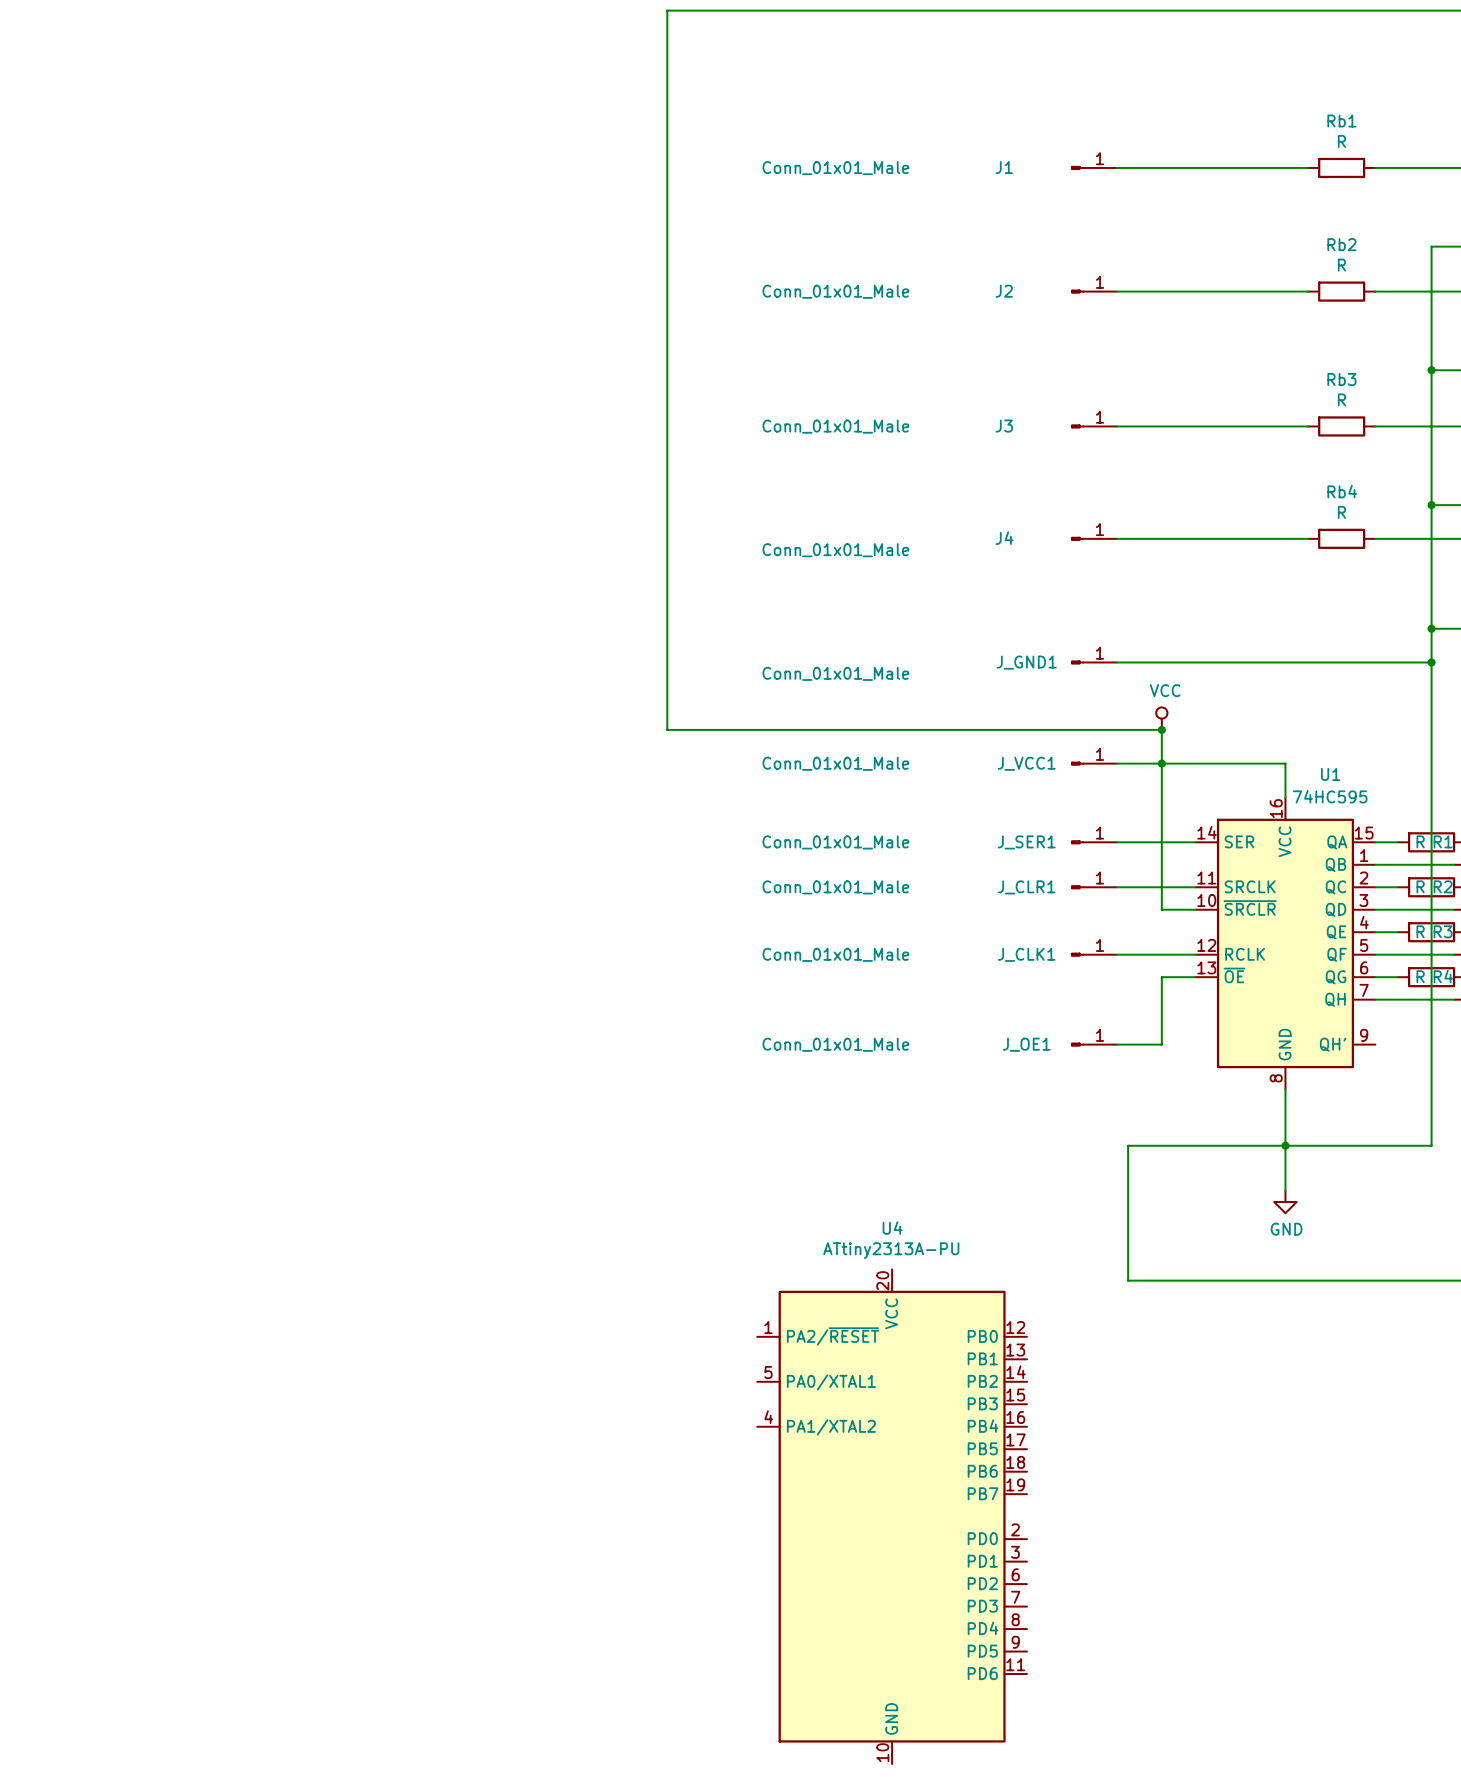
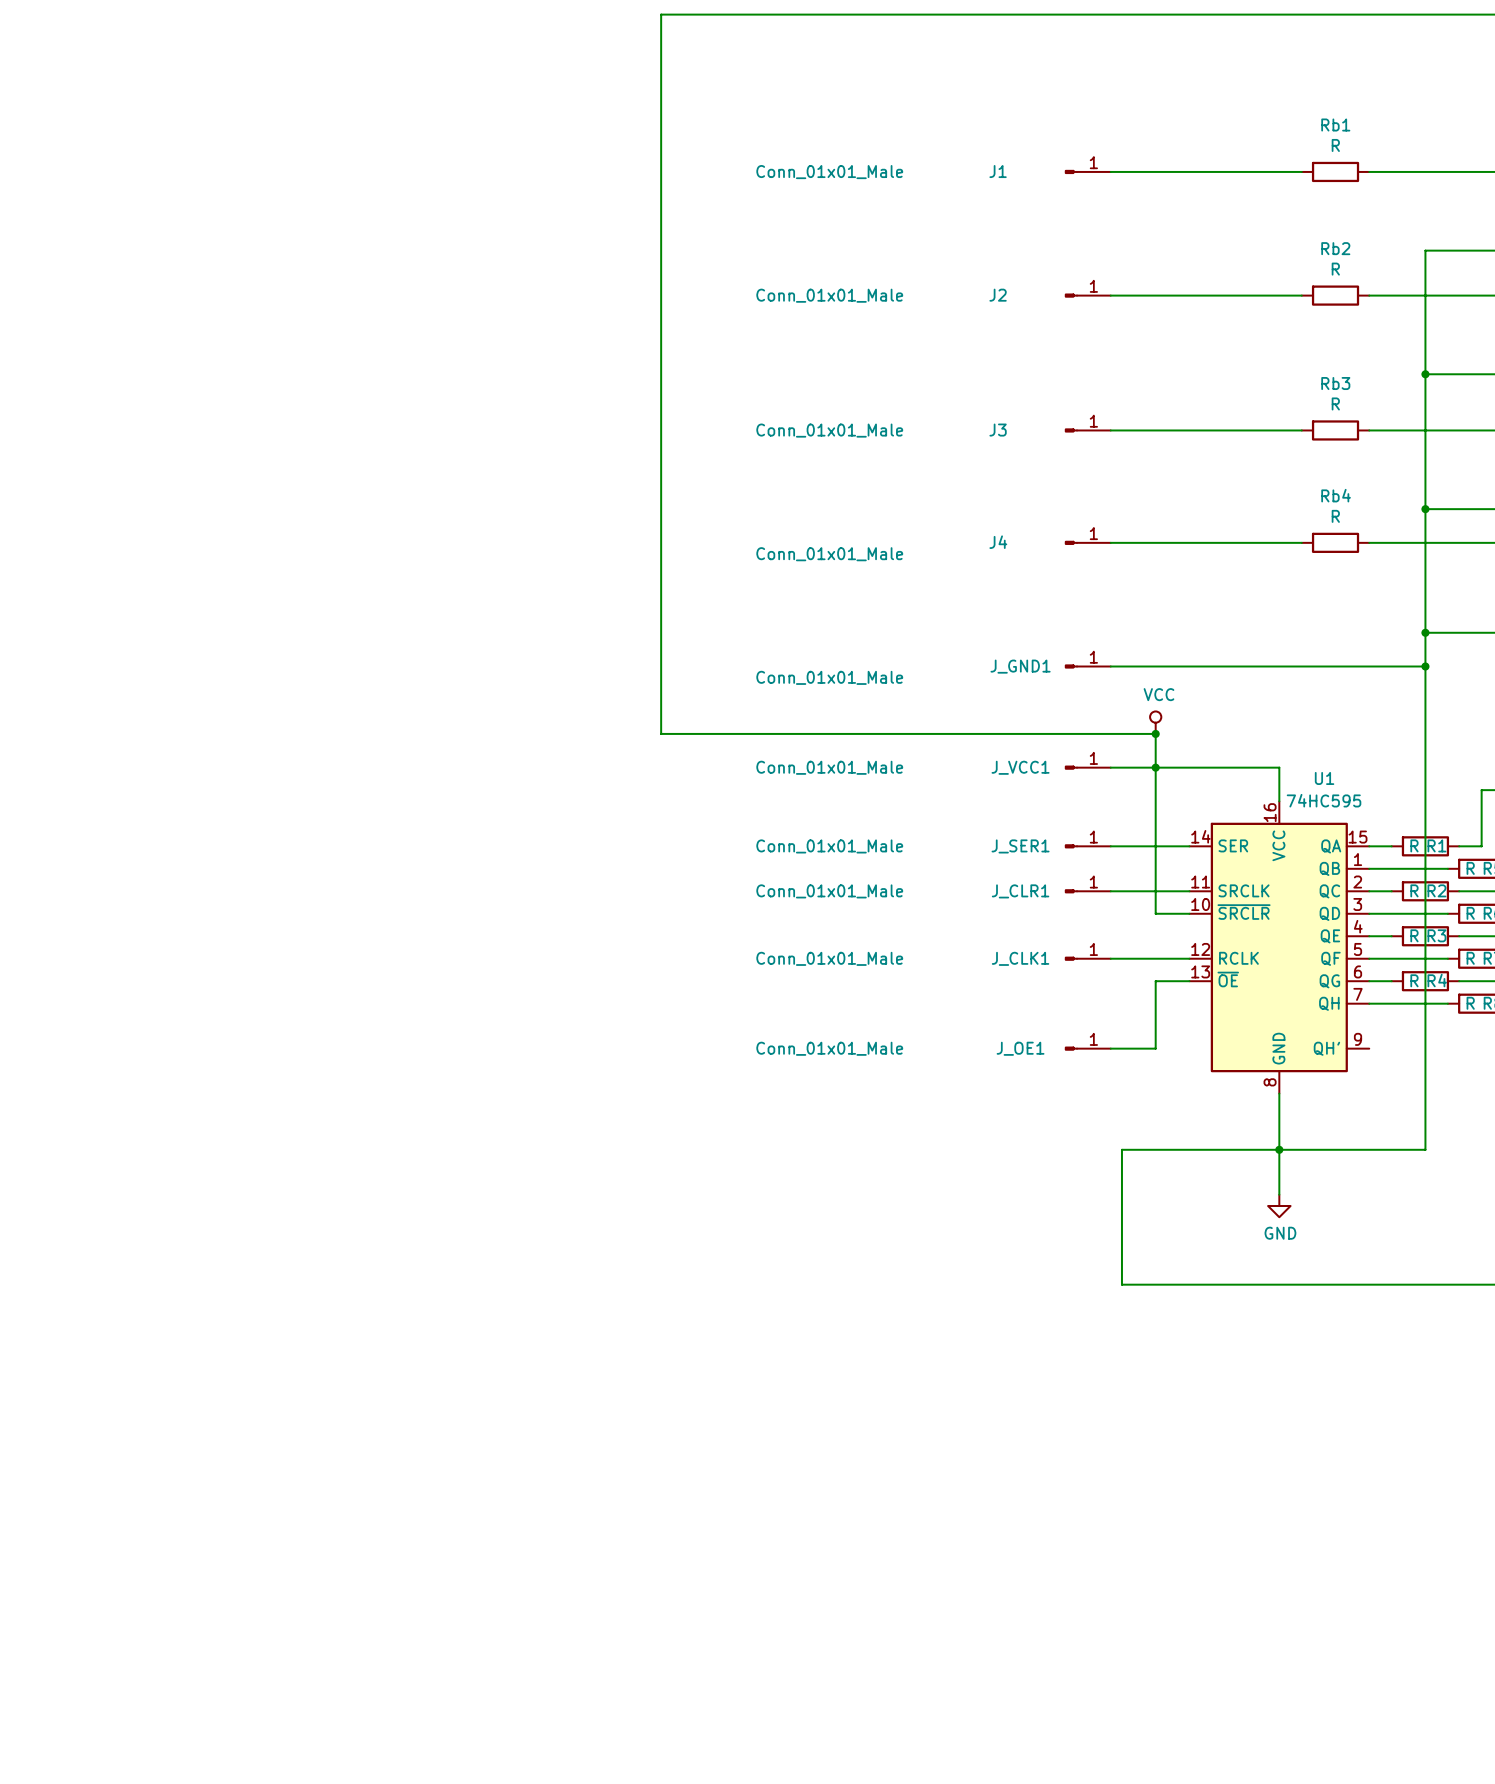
U4: ATtiny2313A-PU (892, 1516) -> none

